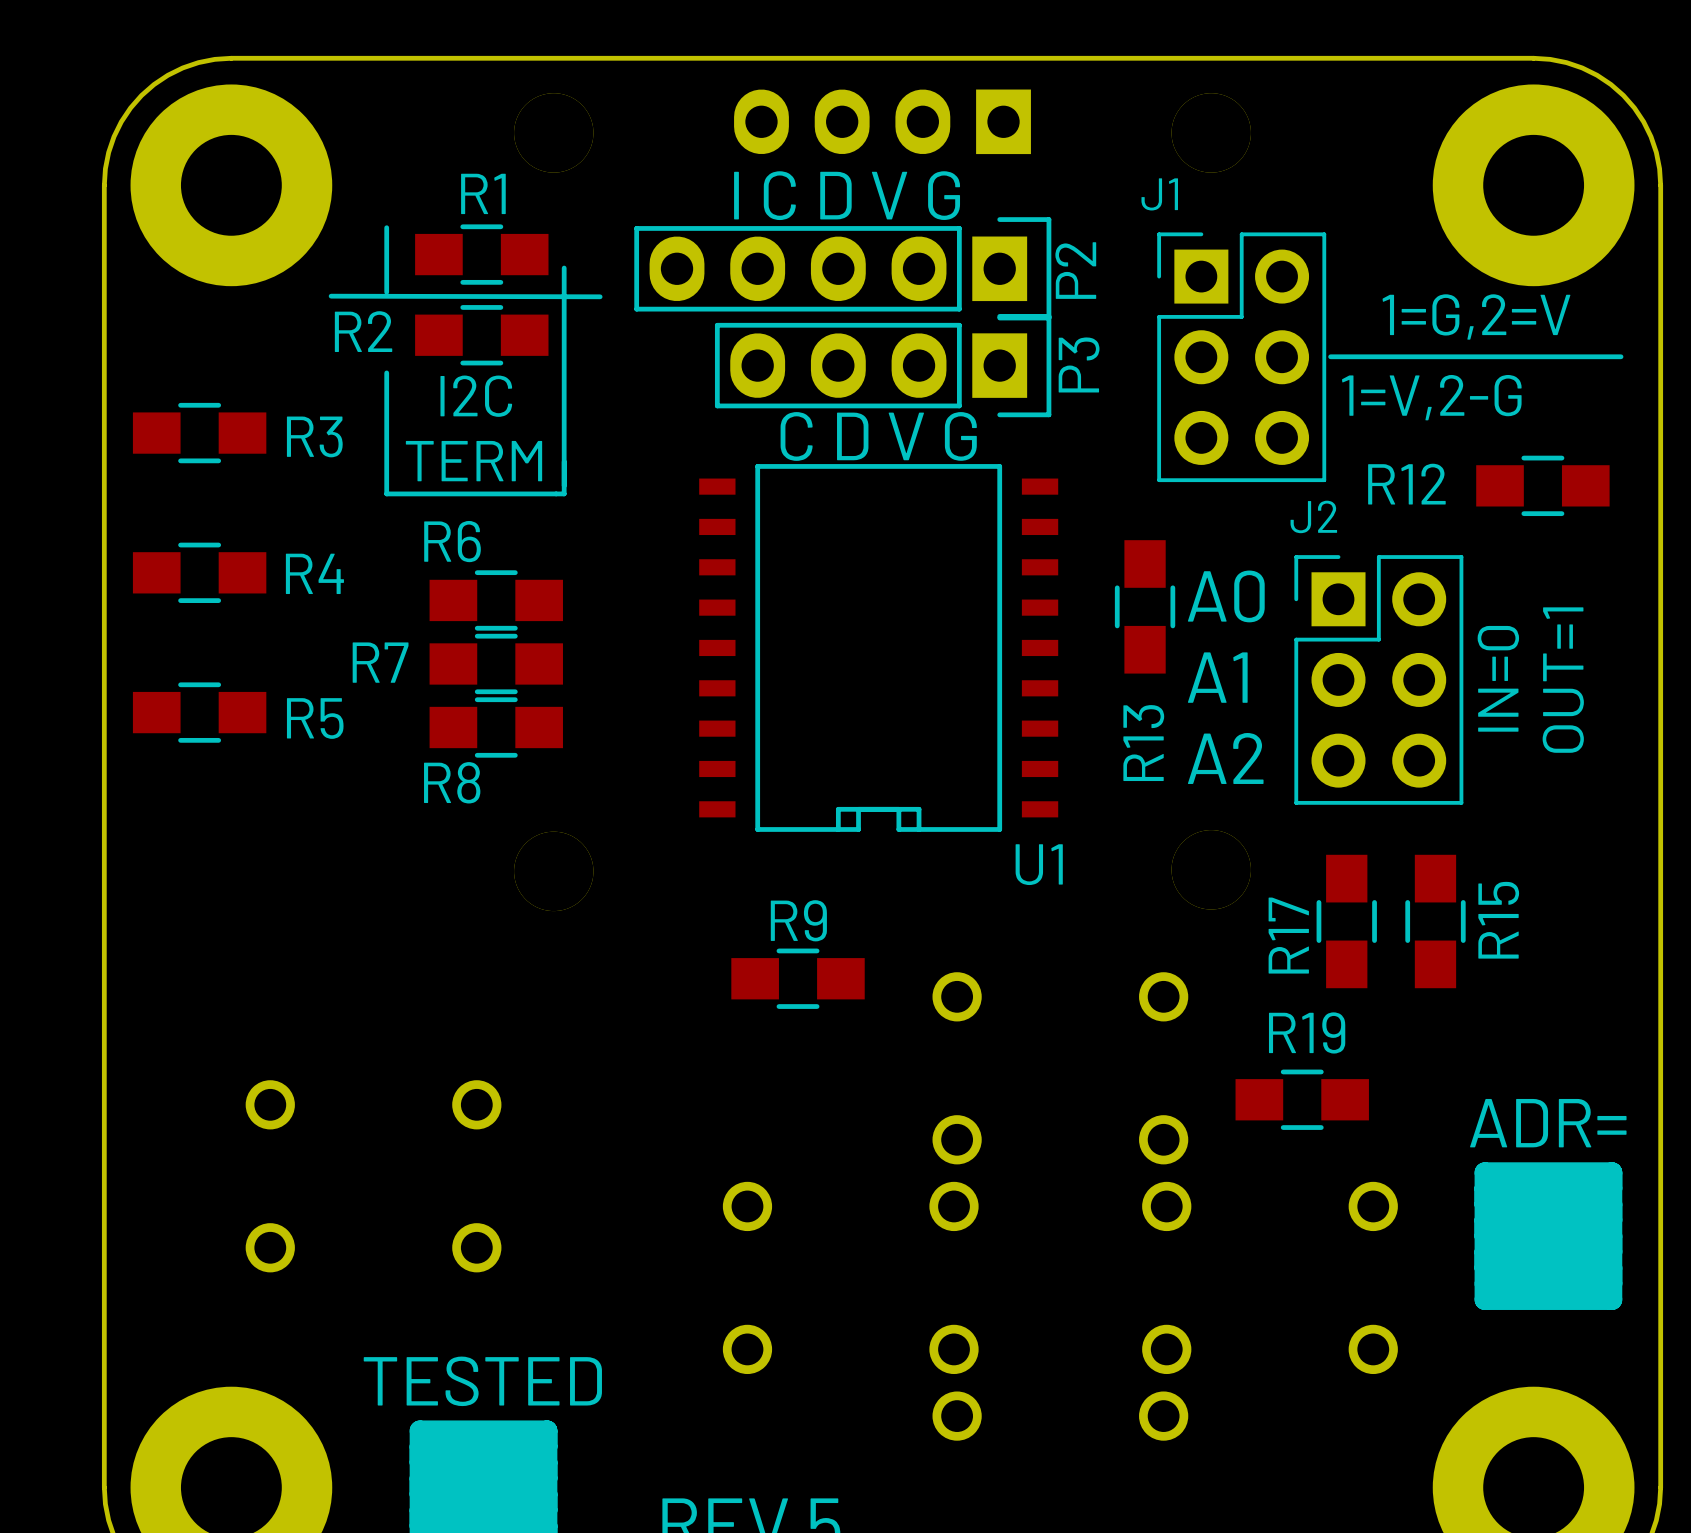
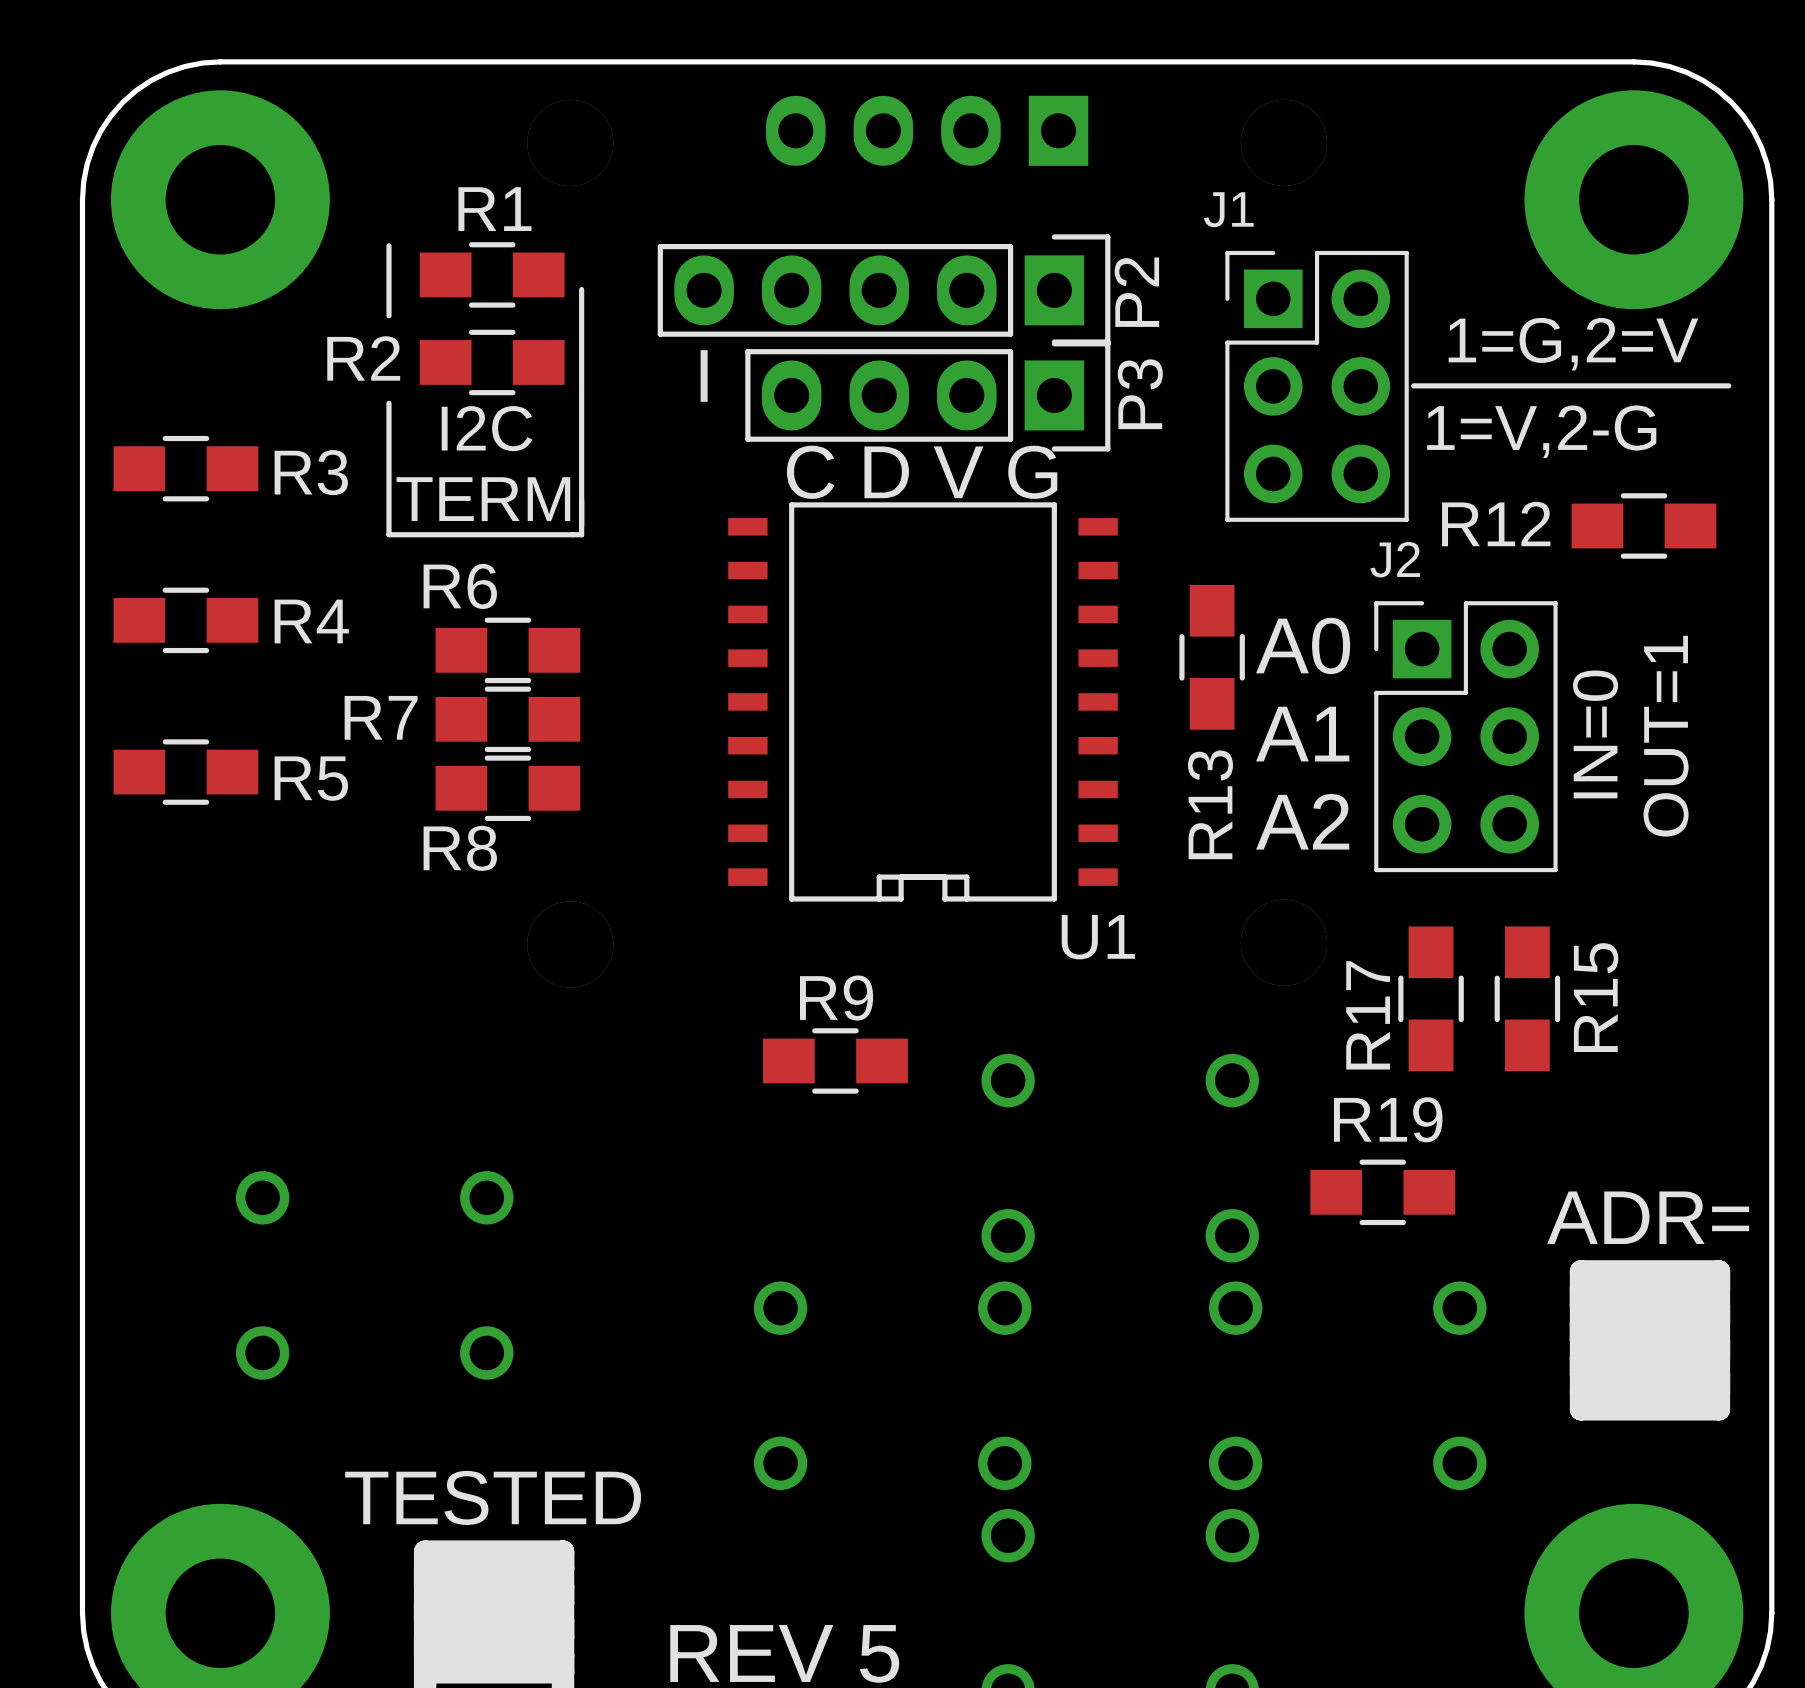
text: I C D V G (847, 195) -> none
line: (331, 296) (600, 296) -> none
text: none -> I (704, 376)

